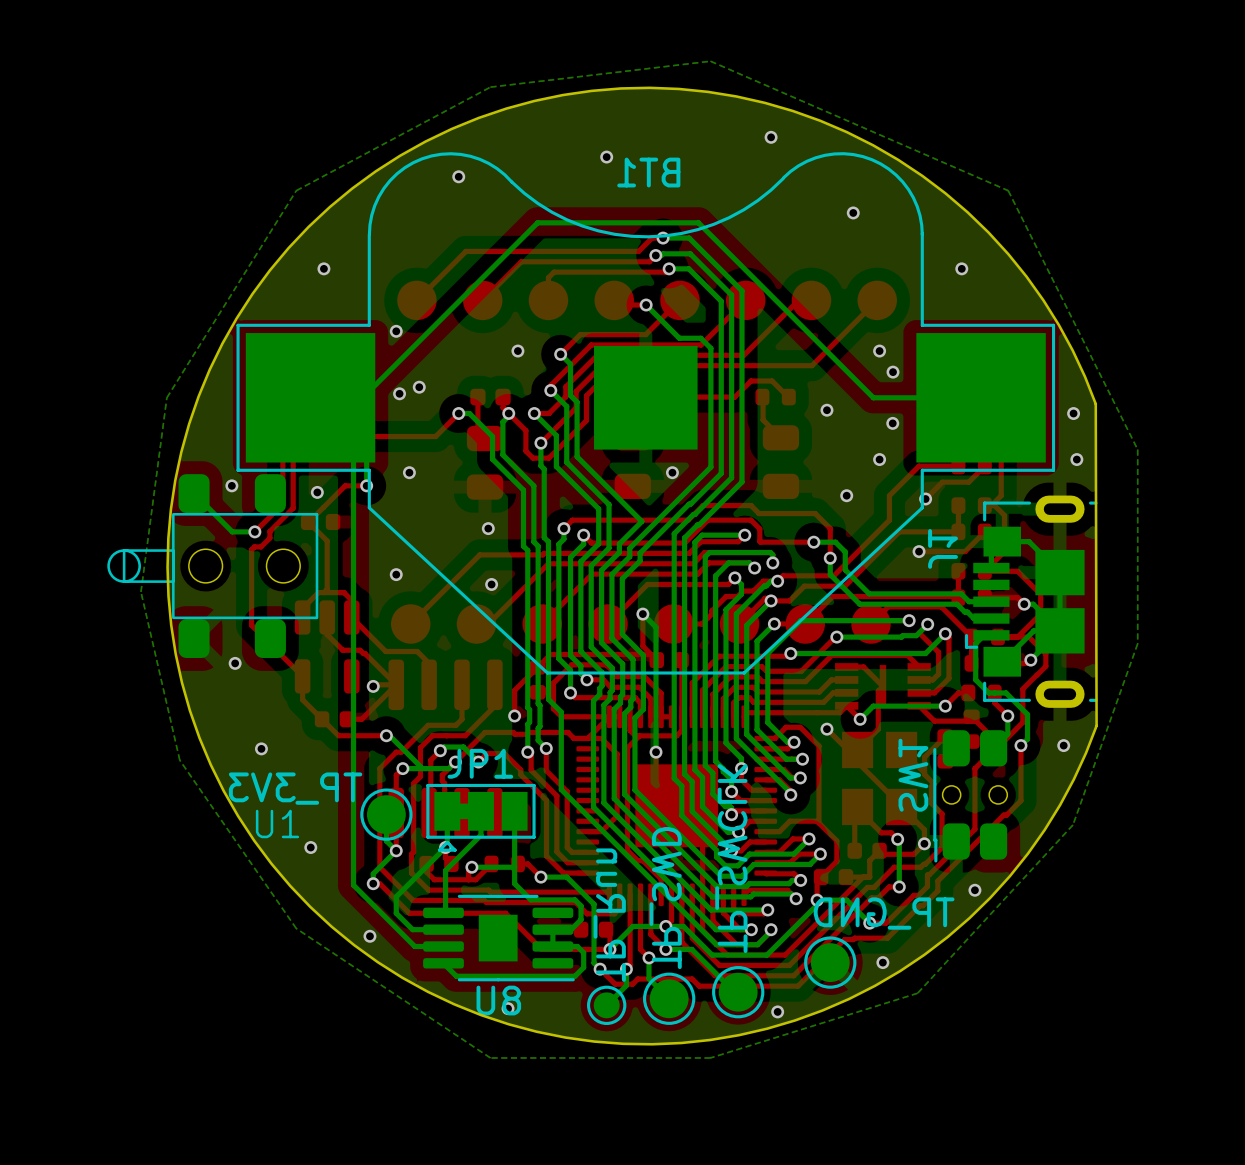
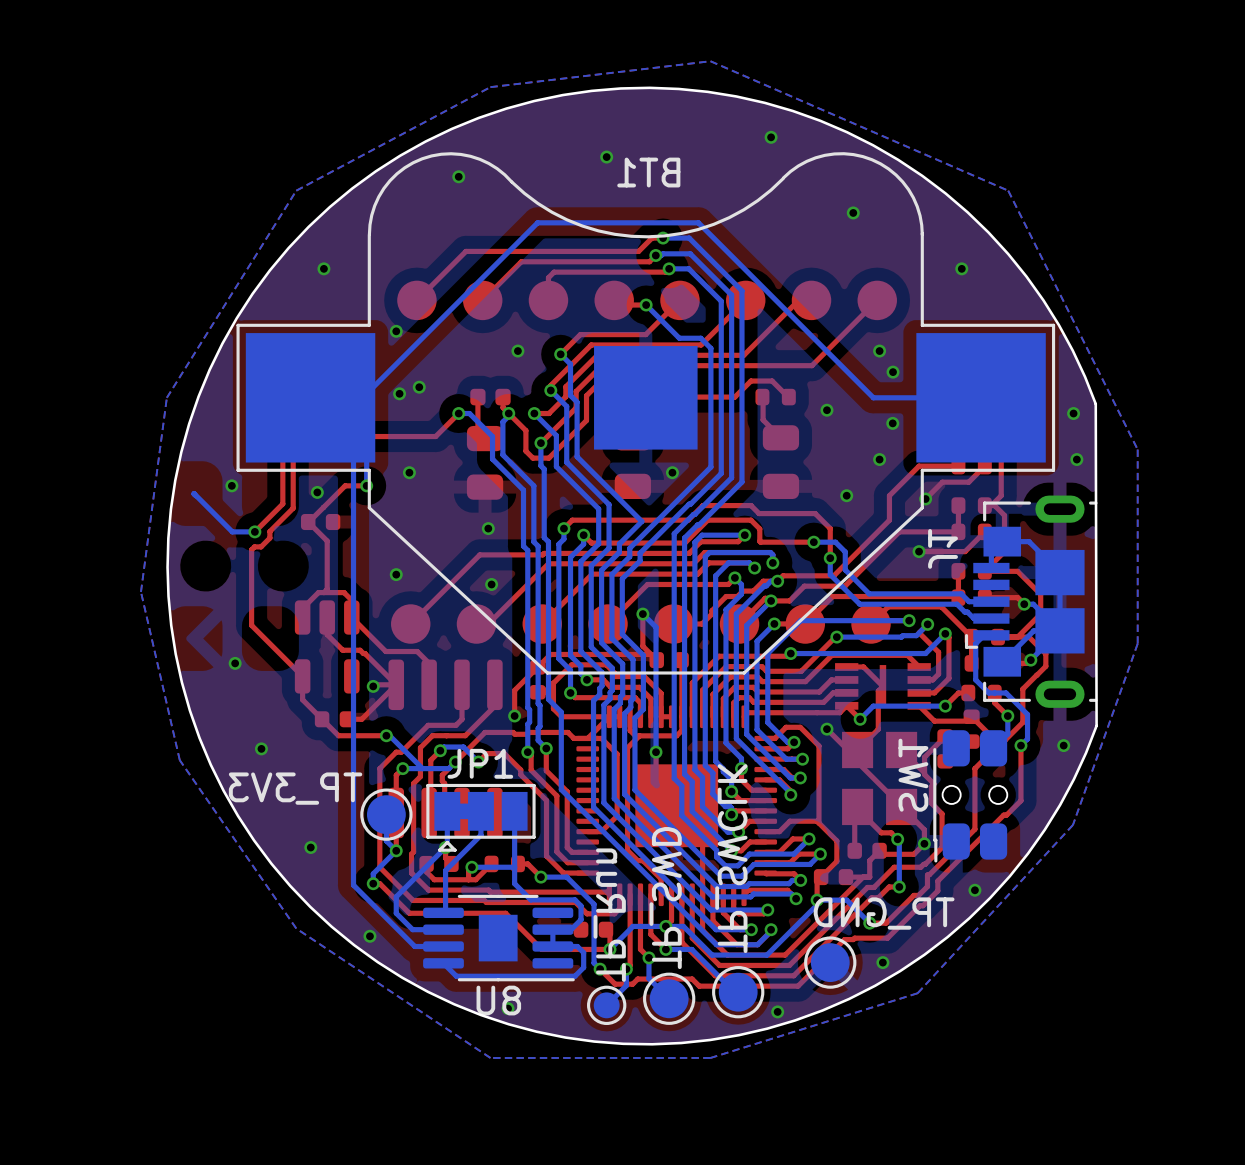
U1: (212, 566) -> none

